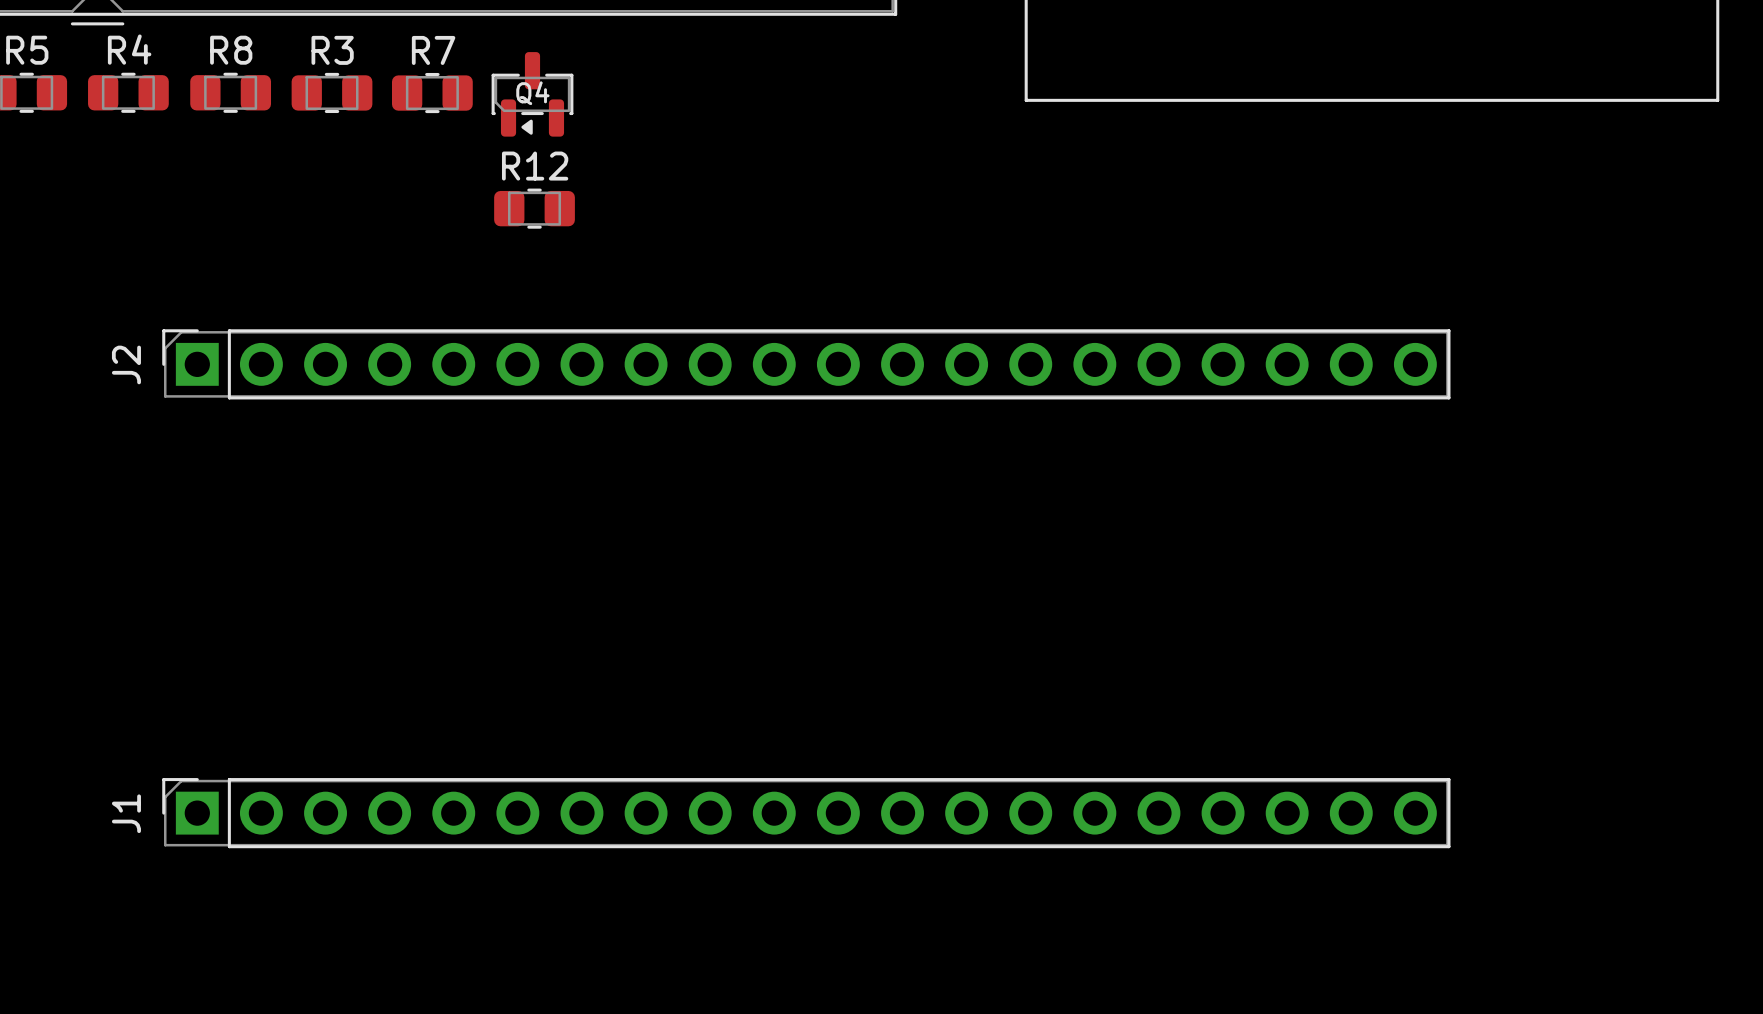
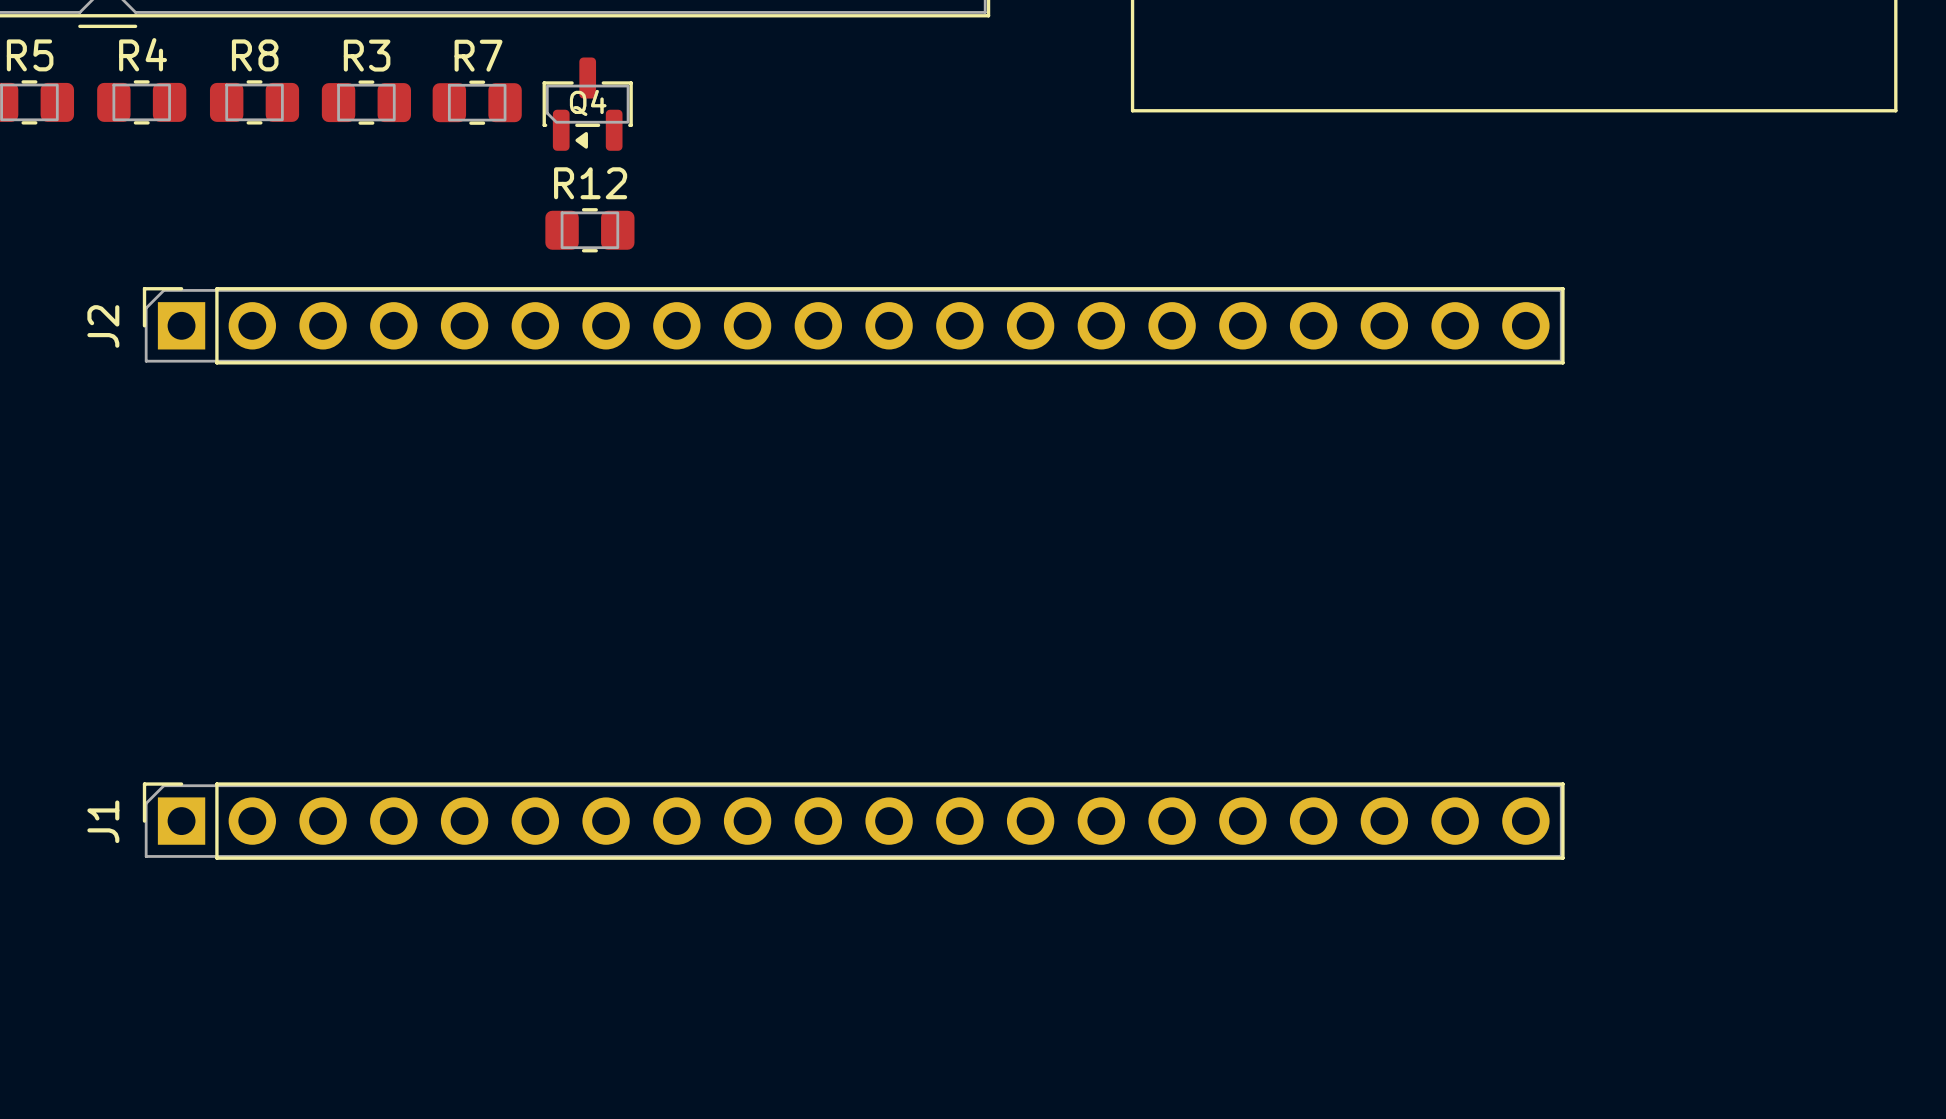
J2 position: (806, 364) -> (853, 325)
J1 position: (806, 813) -> (853, 821)

